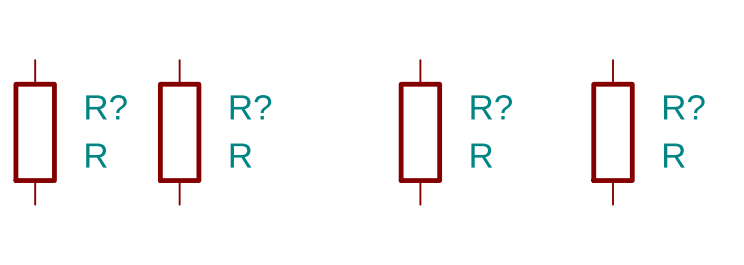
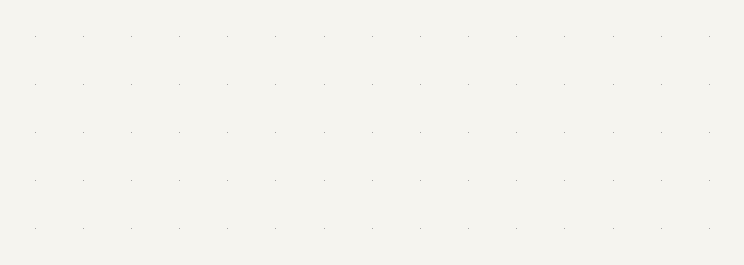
R?: R (35, 132) -> none
R?: R (179, 132) -> none
R?: R (420, 132) -> none
R?: R (613, 132) -> none

